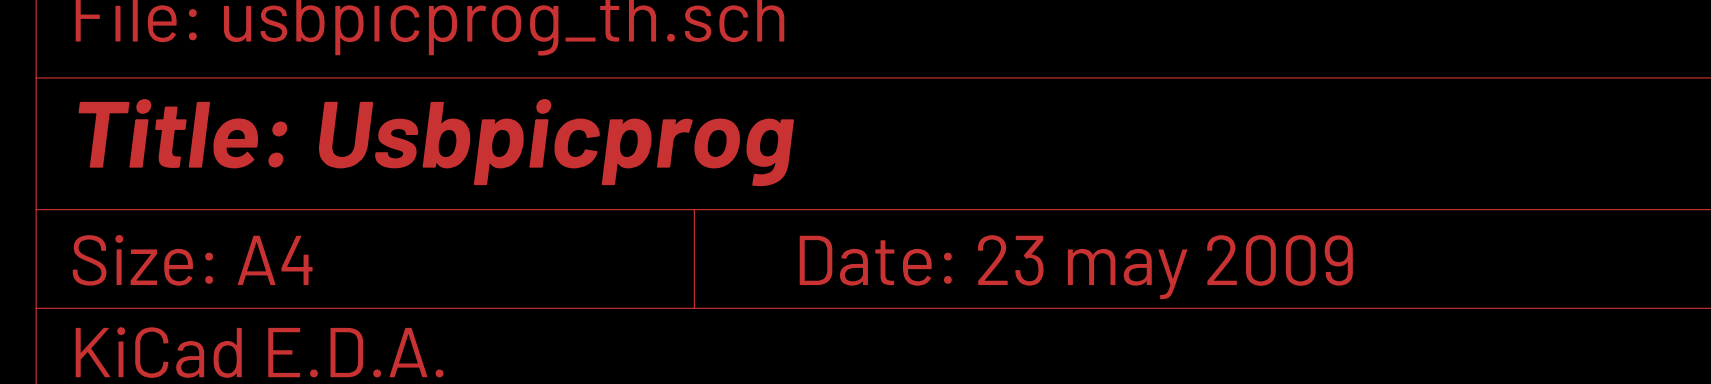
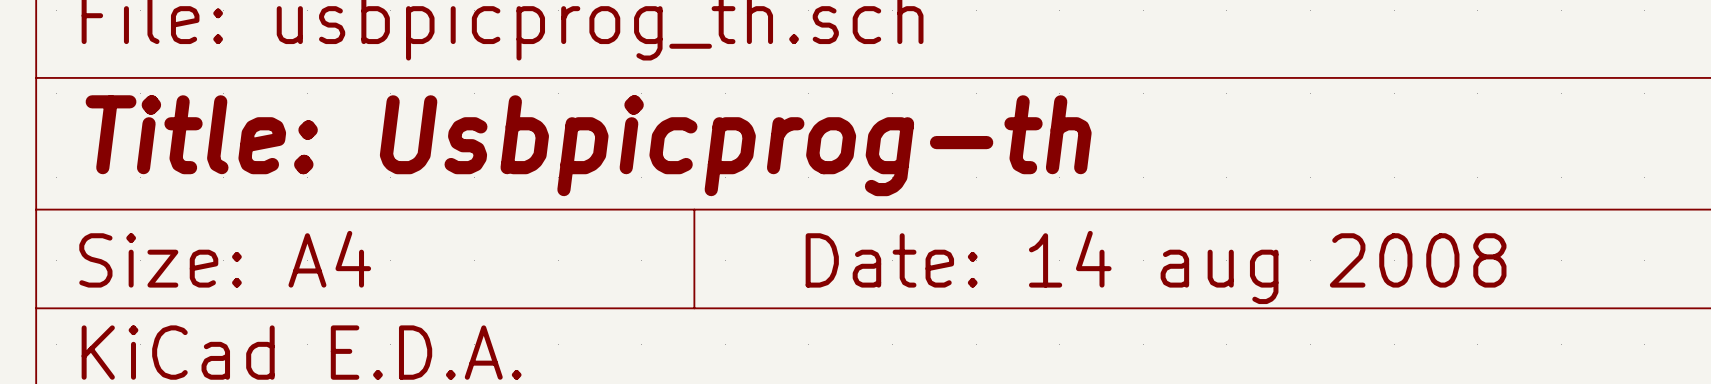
title block: Title: Usbpicprog (436, 142) -> Title: Usbpicprog-th (588, 145)
title block: Date: 23 may 2009 (1076, 267) -> Date: 14 aug 2008 (1156, 267)

